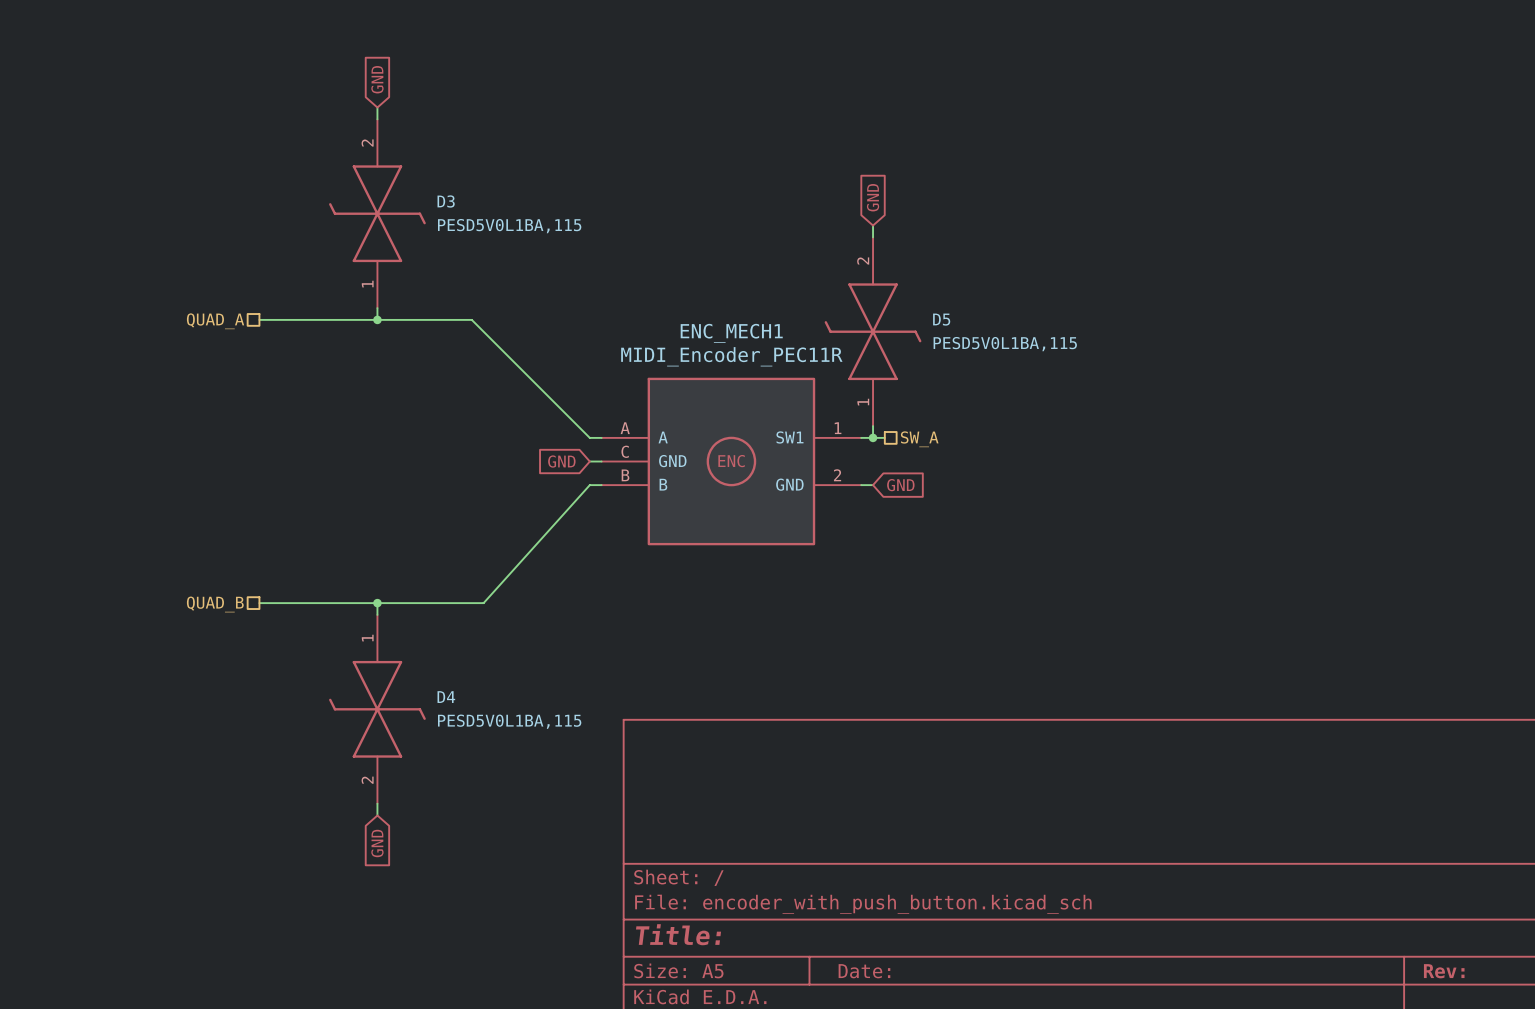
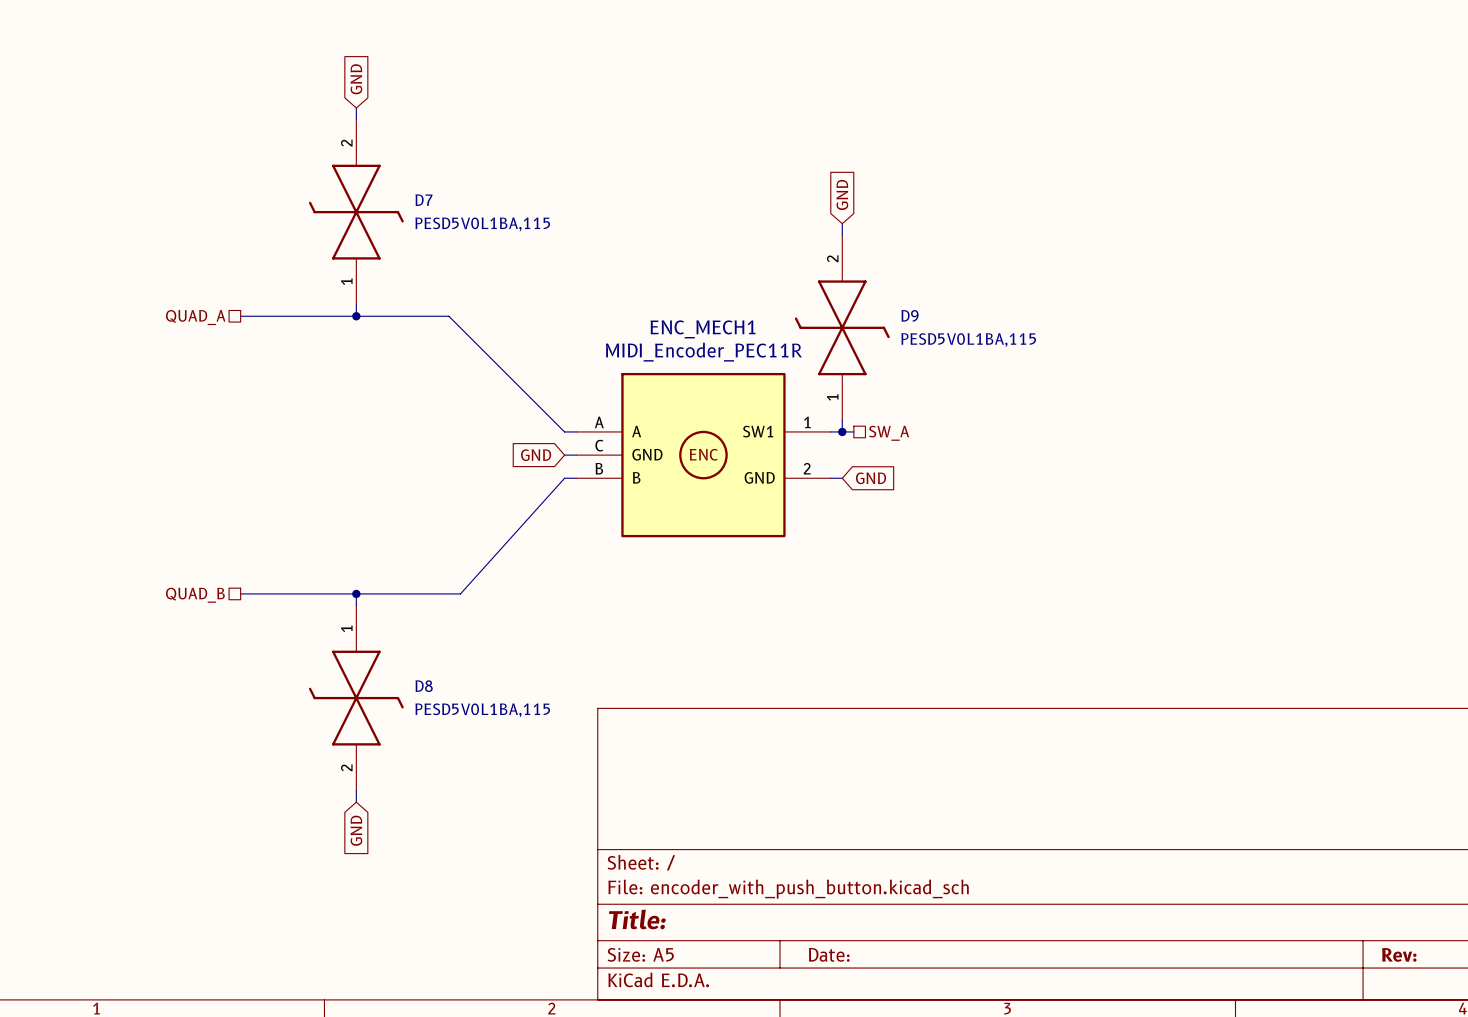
D3 name: D3 (446, 201) -> D7 (423, 200)
D5 name: D5 (941, 319) -> D9 (910, 315)
D4 name: D4 (446, 697) -> D8 (424, 686)

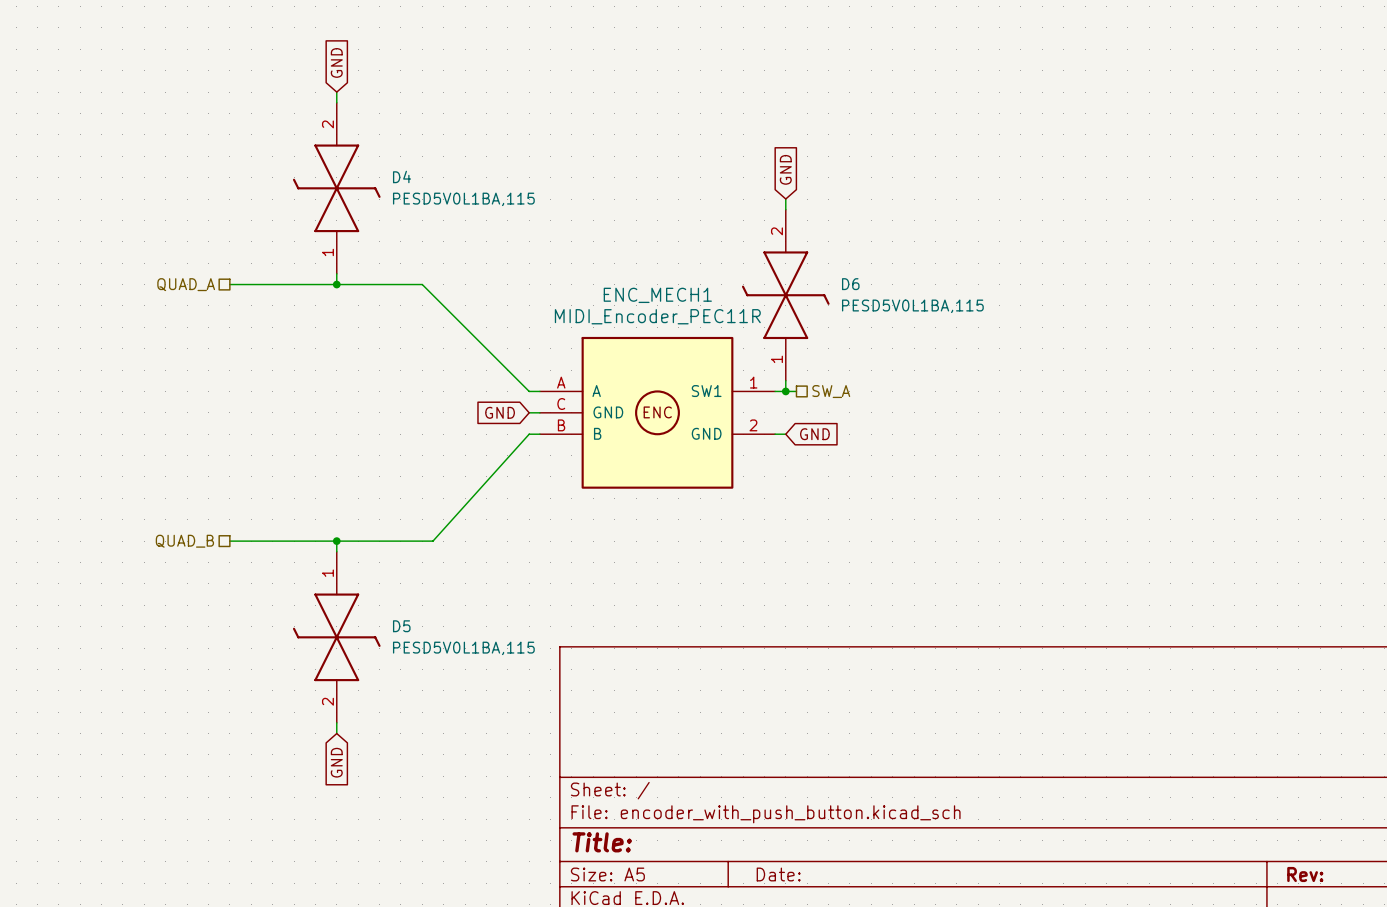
D7 name: D7 (423, 200) -> D4 (402, 176)
D9 name: D9 (910, 315) -> D6 (850, 284)
D8 name: D8 (424, 686) -> D5 (401, 626)

